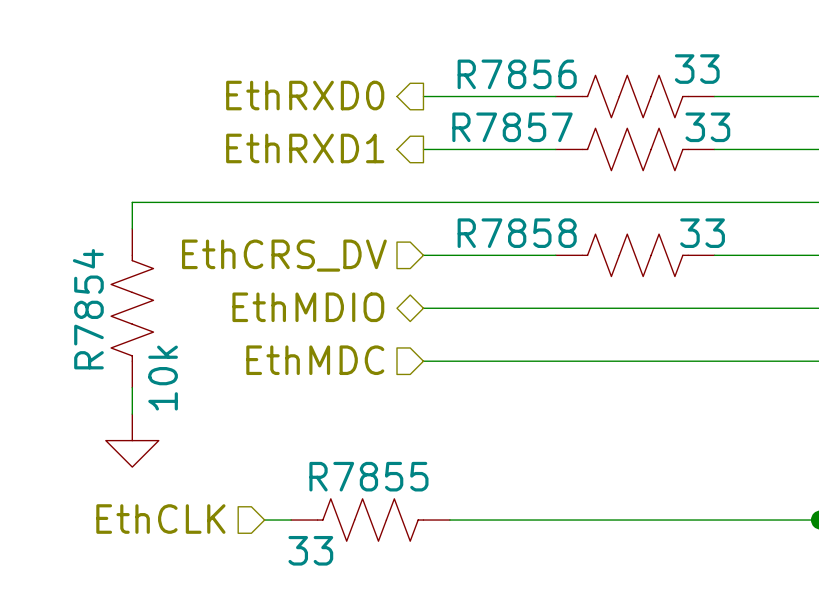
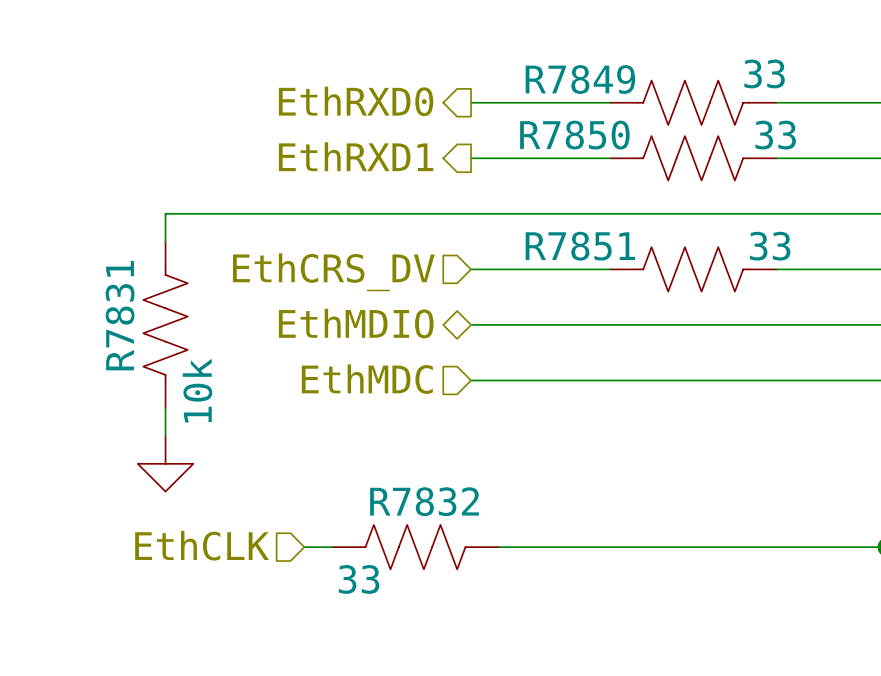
R7856 name: R7856 (517, 74) -> R7849 (580, 79)
R7857 name: R7857 (512, 127) -> R7850 (574, 135)
R7858 name: R7858 (517, 233) -> R7851 (580, 246)
R7854 name: R7854 (88, 309) -> R7831 (120, 315)
R7855 name: R7855 (368, 476) -> R7832 (424, 501)

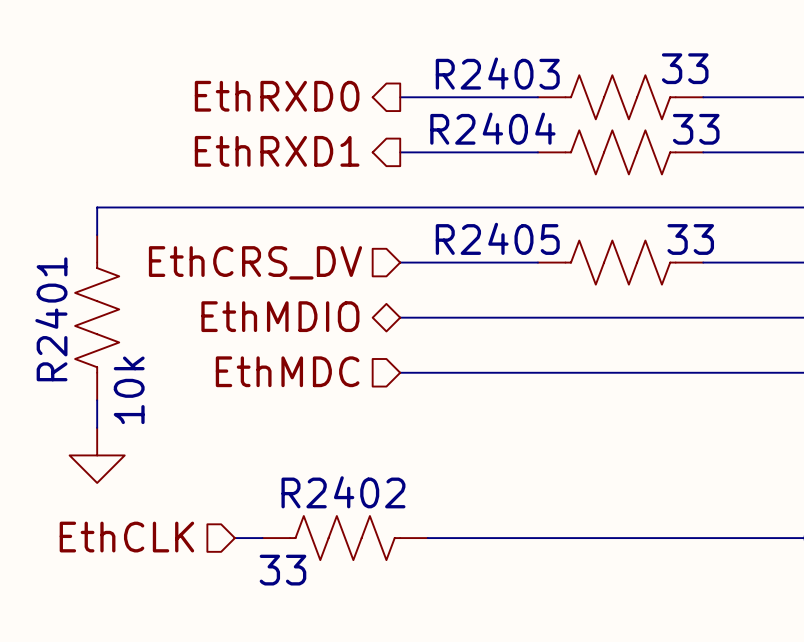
R7849 name: R7849 (580, 79) -> R2403 (497, 73)
R7850 name: R7850 (574, 135) -> R2404 (492, 128)
R7851 name: R7851 (580, 246) -> R2405 (497, 238)
R7831 name: R7831 (120, 315) -> R2401 (51, 319)
R7832 name: R7832 (424, 501) -> R2402 (343, 492)

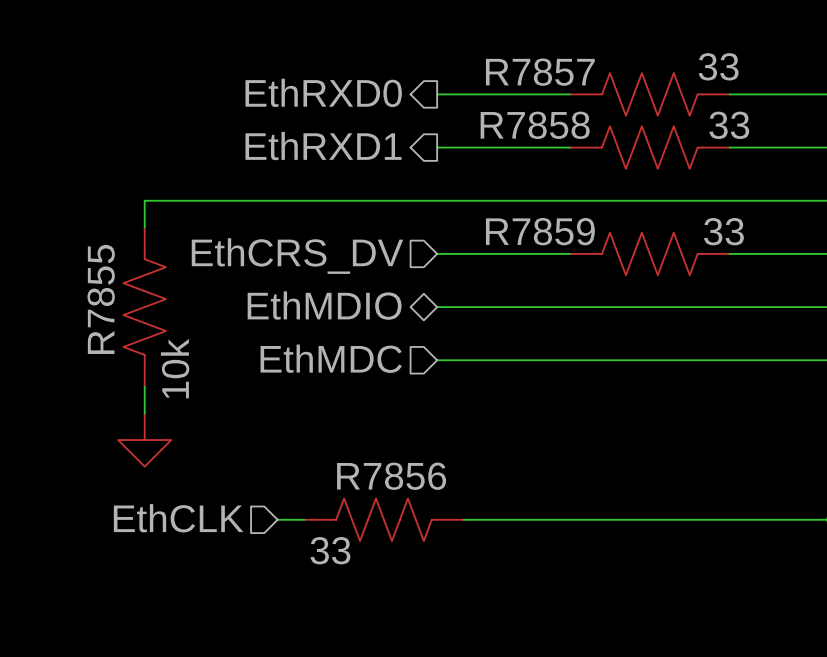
R2403 name: R2403 (497, 73) -> R7857 (540, 72)
R2404 name: R2404 (492, 128) -> R7858 (535, 125)
R2405 name: R2405 (497, 238) -> R7859 (540, 231)
R2401 name: R2401 (51, 319) -> R7855 (101, 299)
R2402 name: R2402 (343, 492) -> R7856 (391, 476)

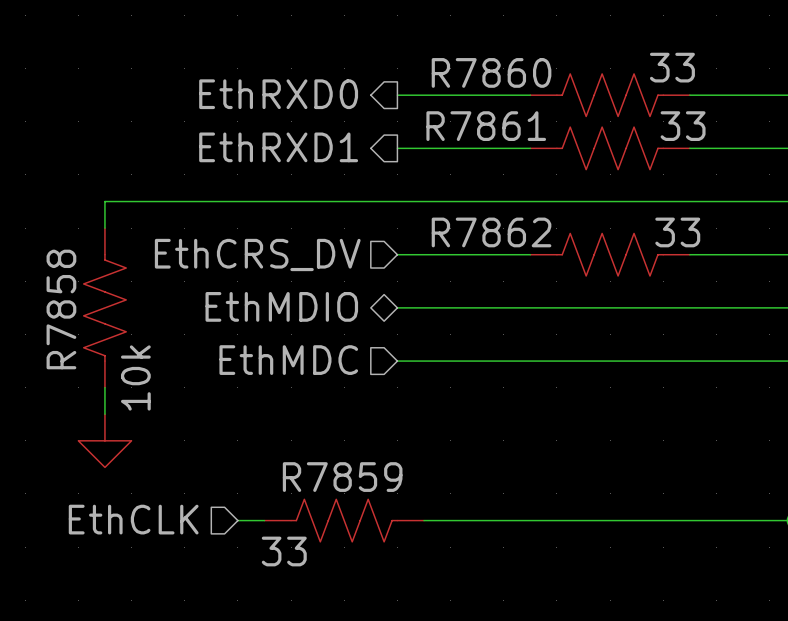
R7857 name: R7857 (540, 72) -> R7860 (491, 72)
R7858 name: R7858 (535, 125) -> R7861 (486, 126)
R7859 name: R7859 (540, 231) -> R7862 (491, 232)
R7855 name: R7855 (101, 299) -> R7858 (61, 309)
R7856 name: R7856 (391, 476) -> R7859 (342, 477)

